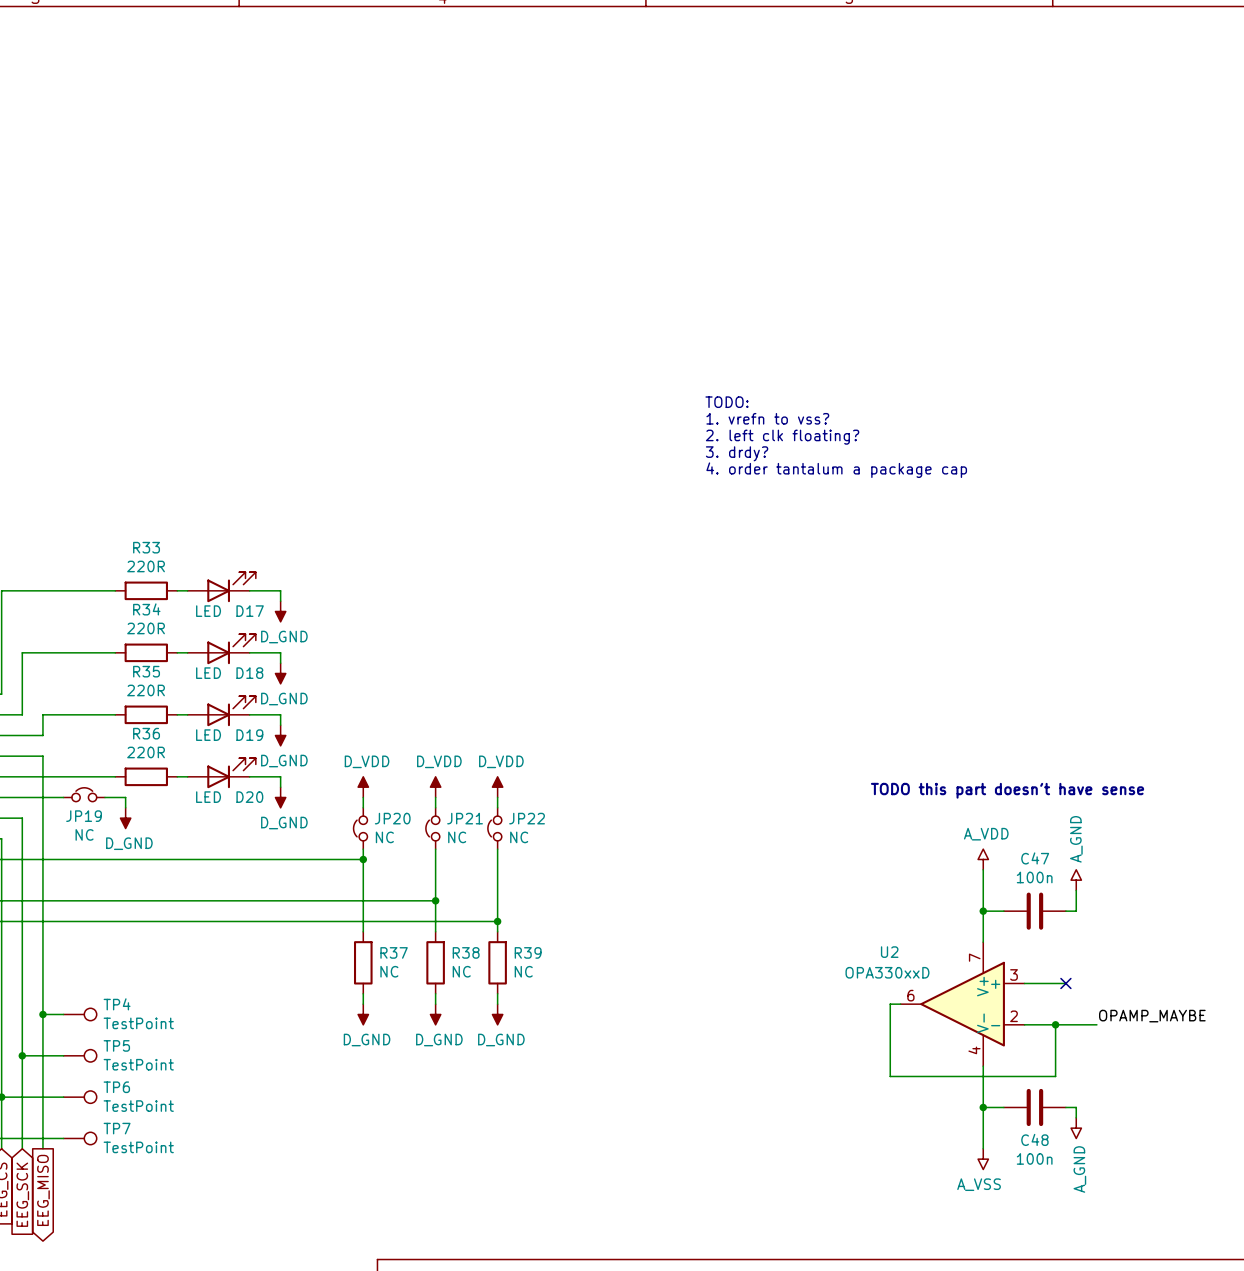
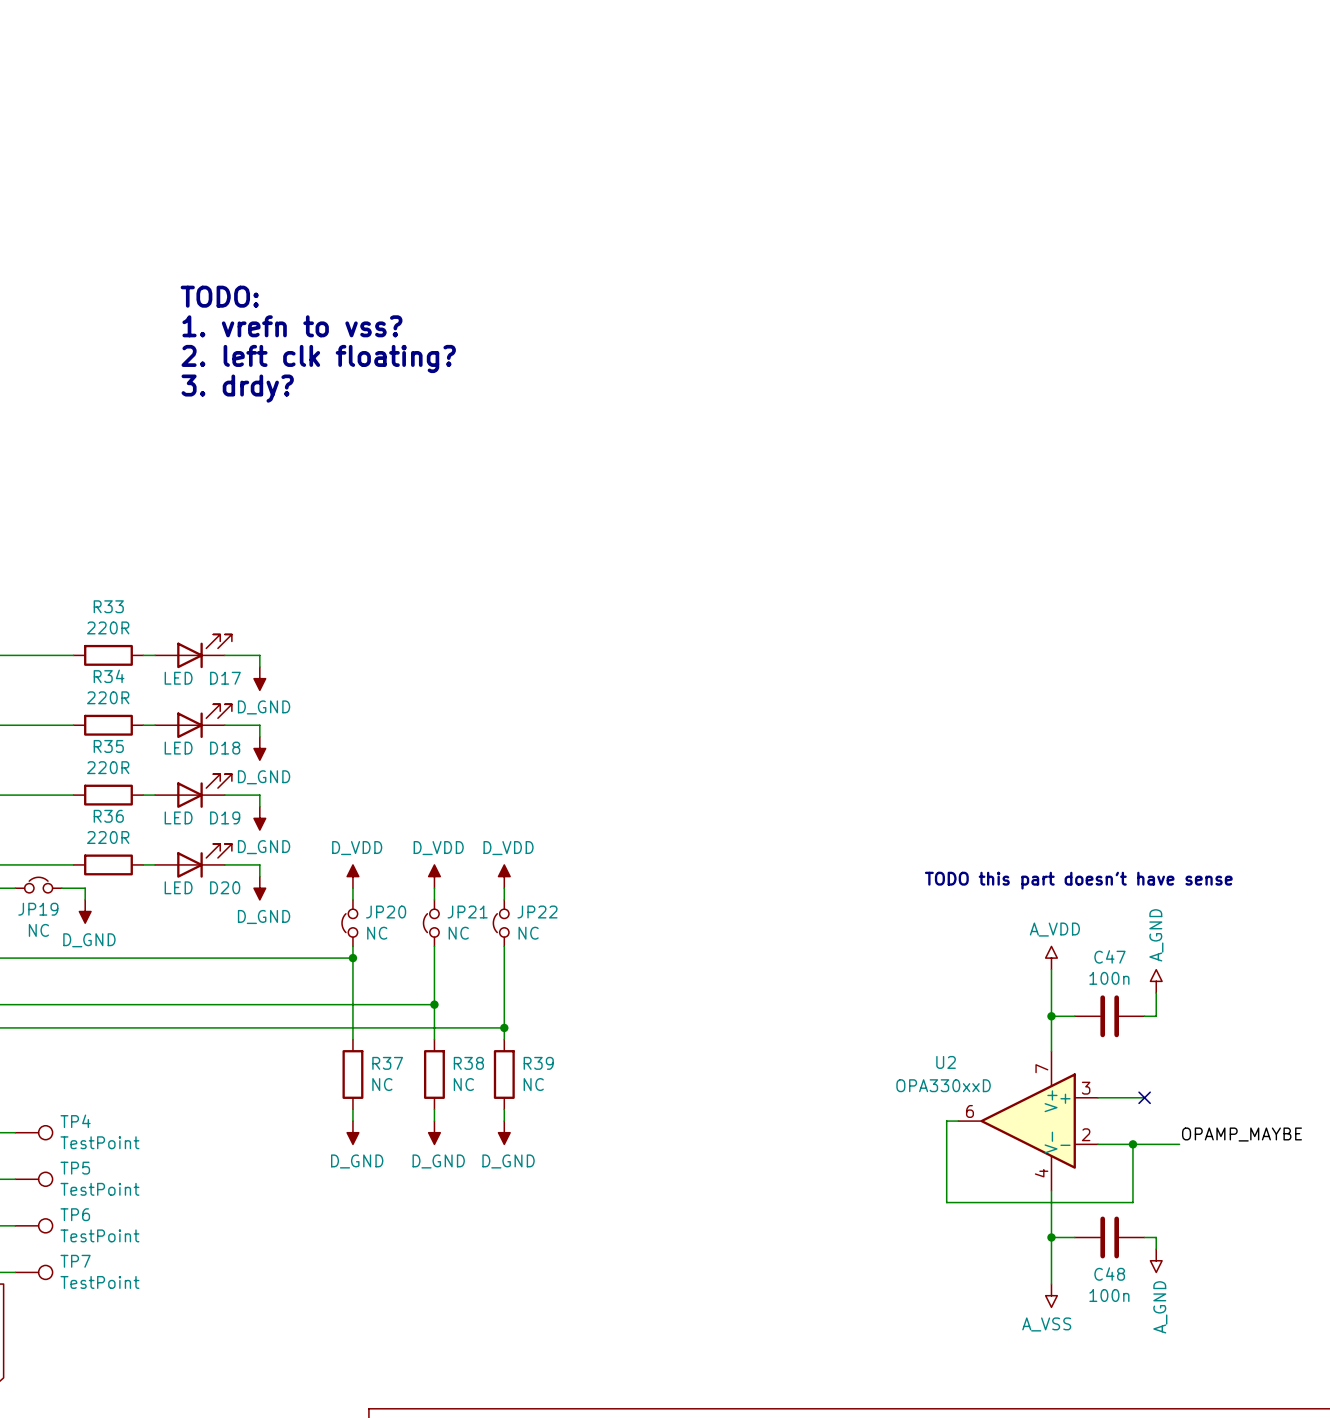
text: none -> TODO: (219, 296)
text: none -> 1. vrefn to vss? (292, 326)
text: none -> 2. left clk floating? (318, 358)
text: none -> 3. drdy? (237, 388)
text: TODO: (726, 402) -> none
text: 1. vrefn to vss? (767, 418) -> none
text: 2. left clk floating? (782, 437) -> none
text: 3. drdy? (737, 453) -> none
text: 4. order tantalum a package cap (836, 470) -> none

